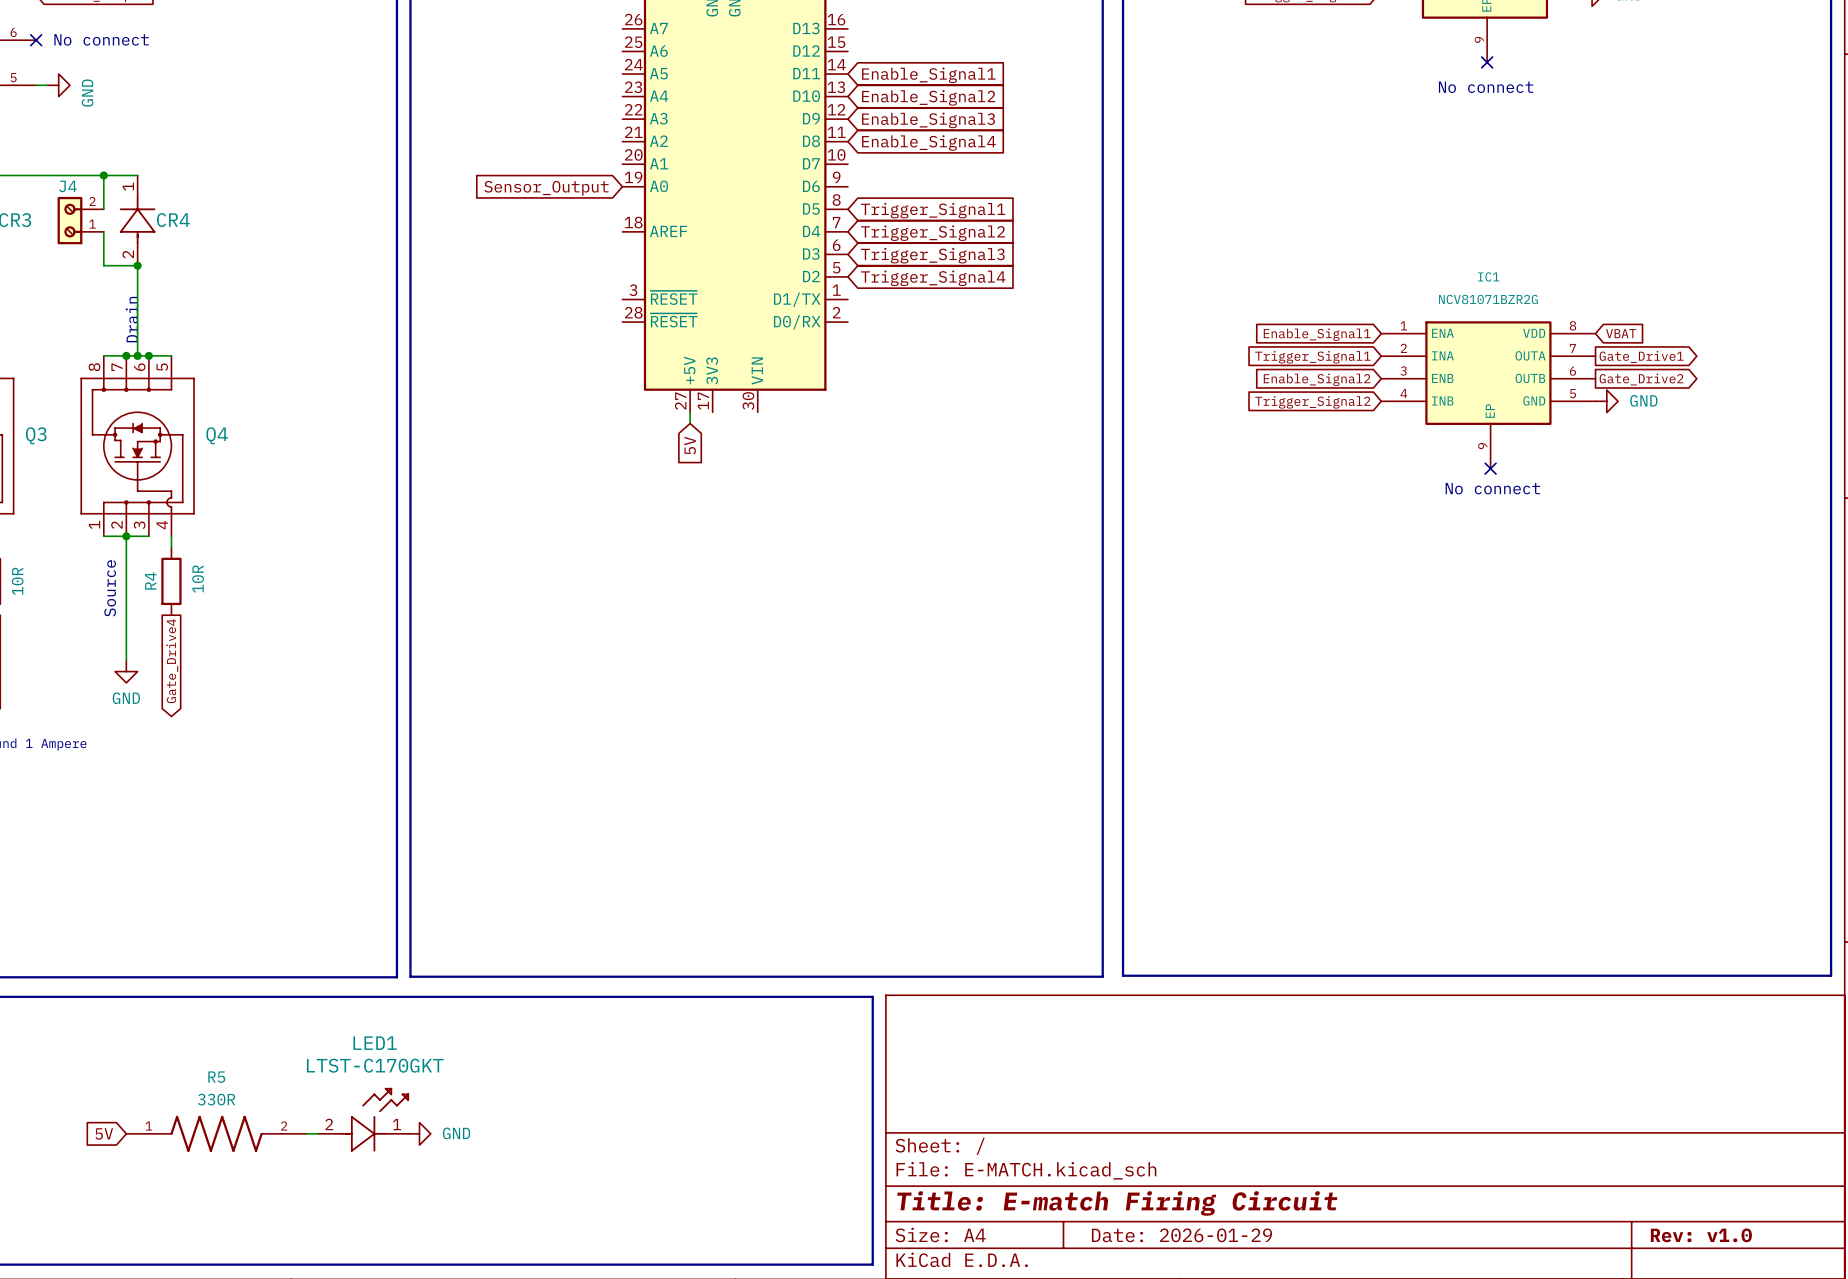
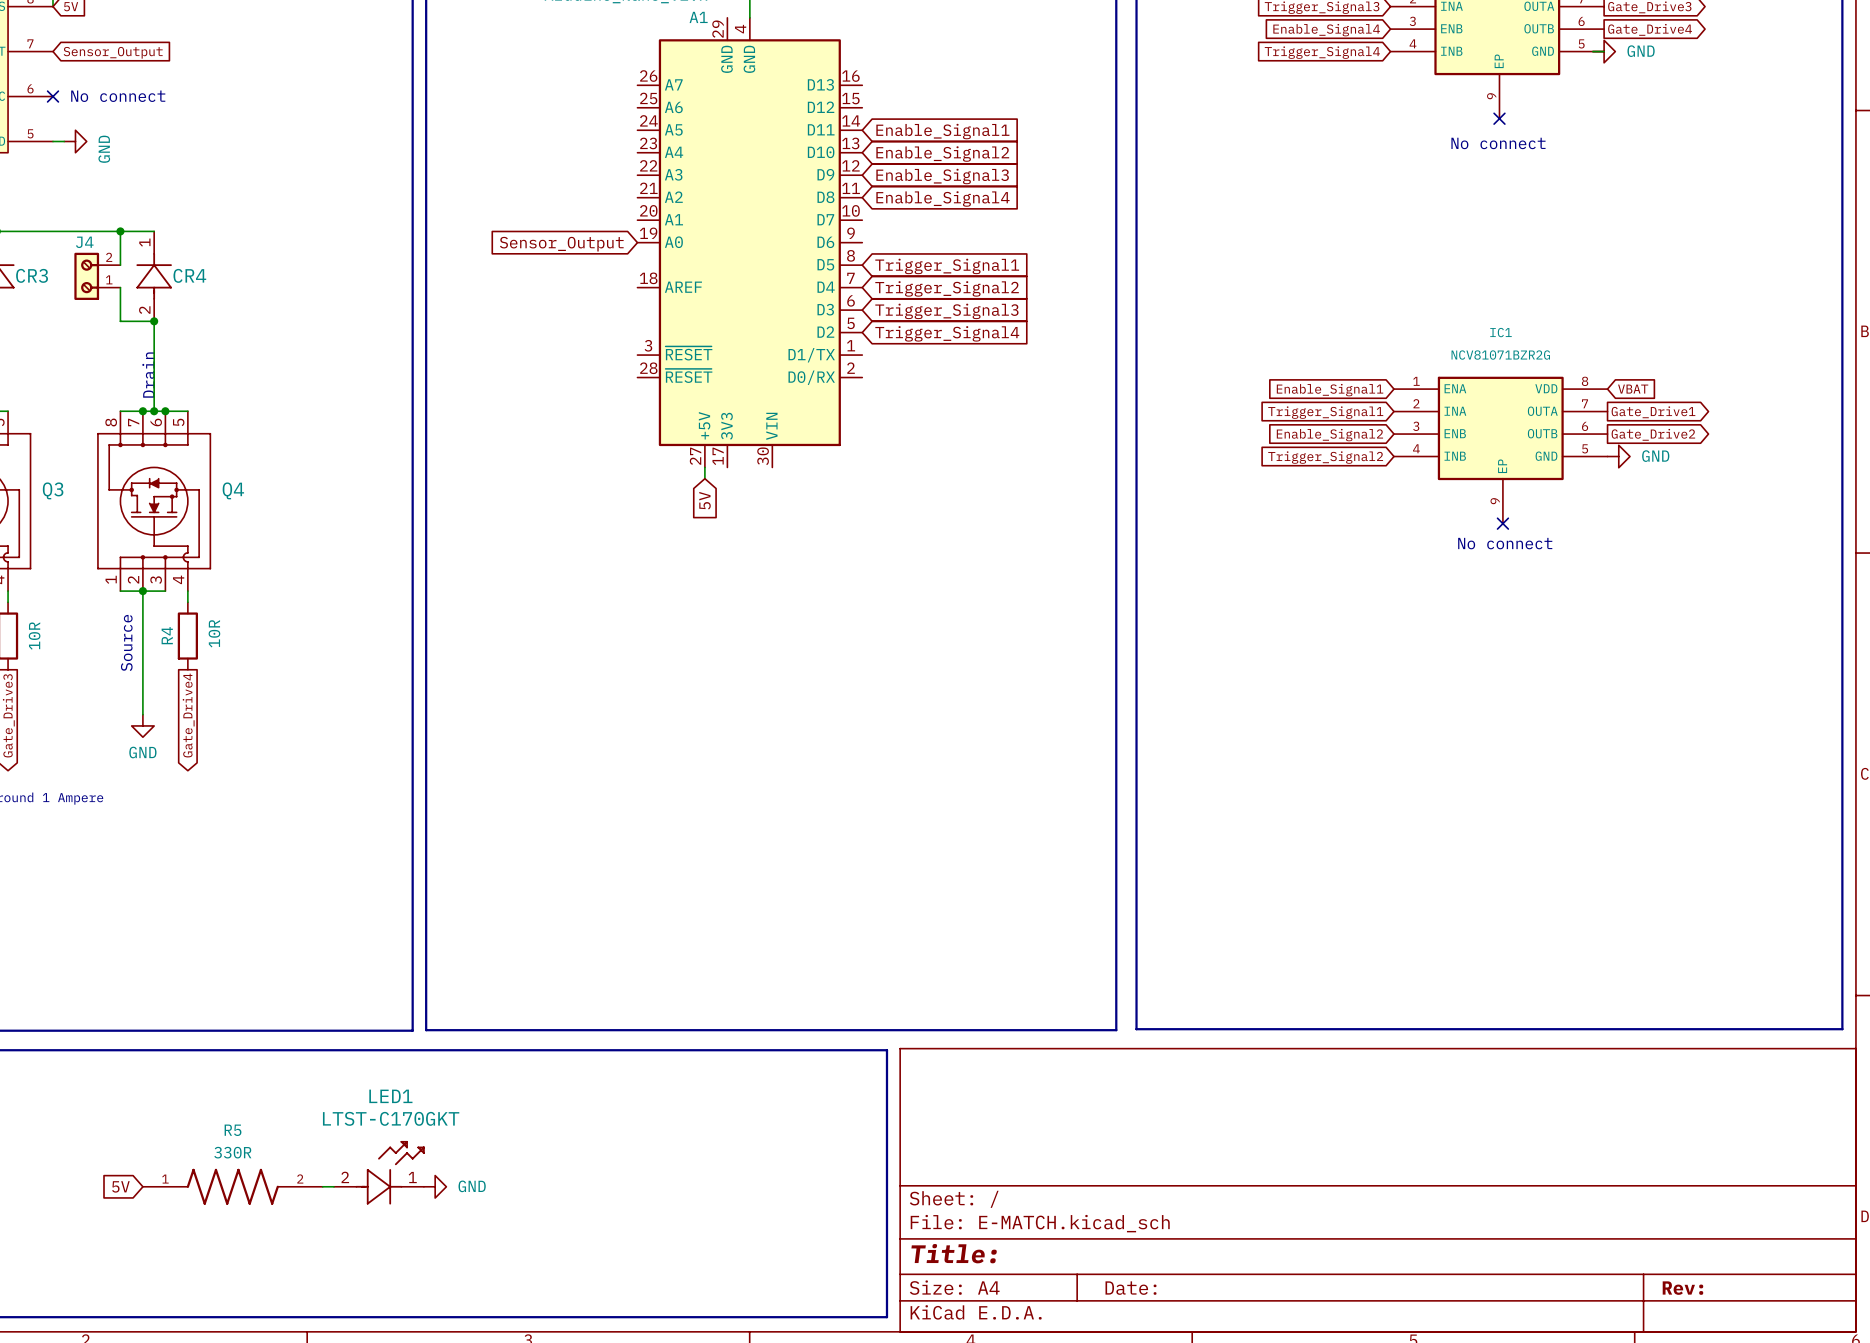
title block: Title: E-match Firing Circuit (1117, 1203) -> Title: (954, 1253)
title block: Date: 2026-01-29 (1181, 1235) -> Date: (1130, 1288)
title block: Rev: v1.0 (1701, 1235) -> Rev: (1682, 1288)

